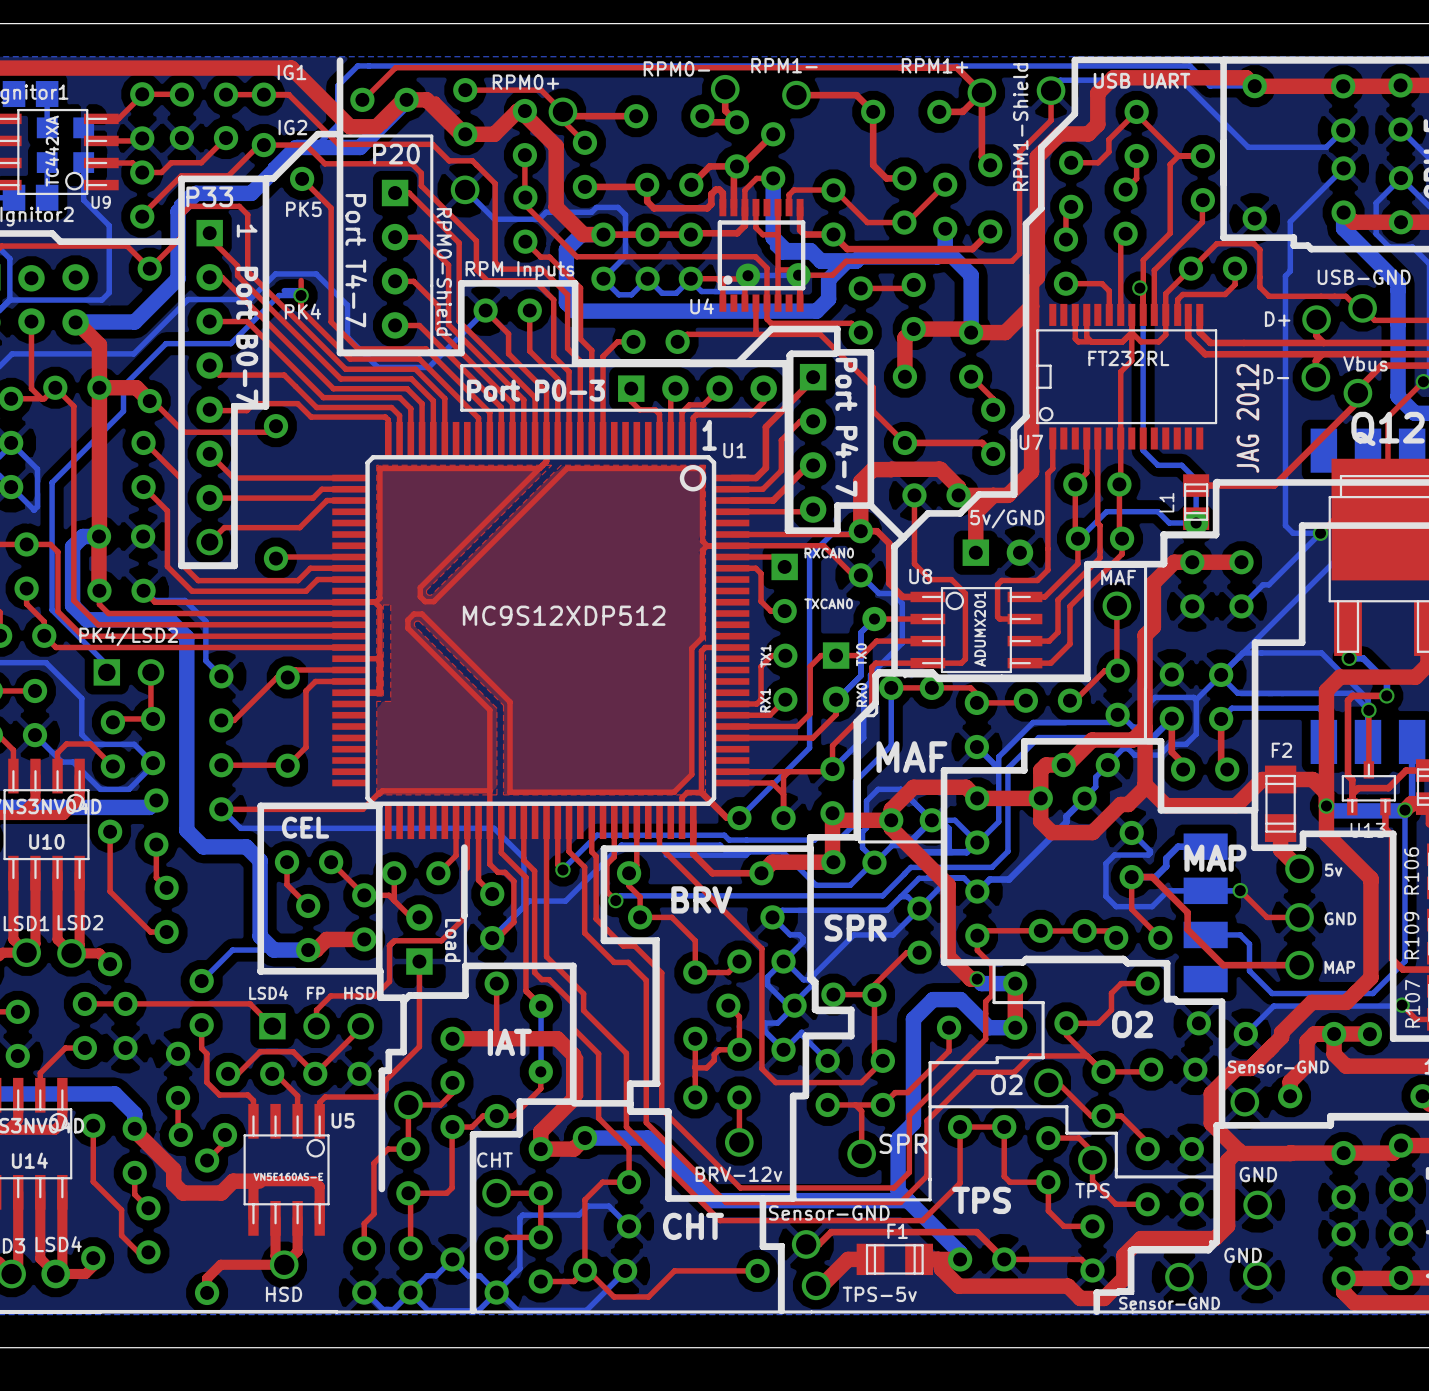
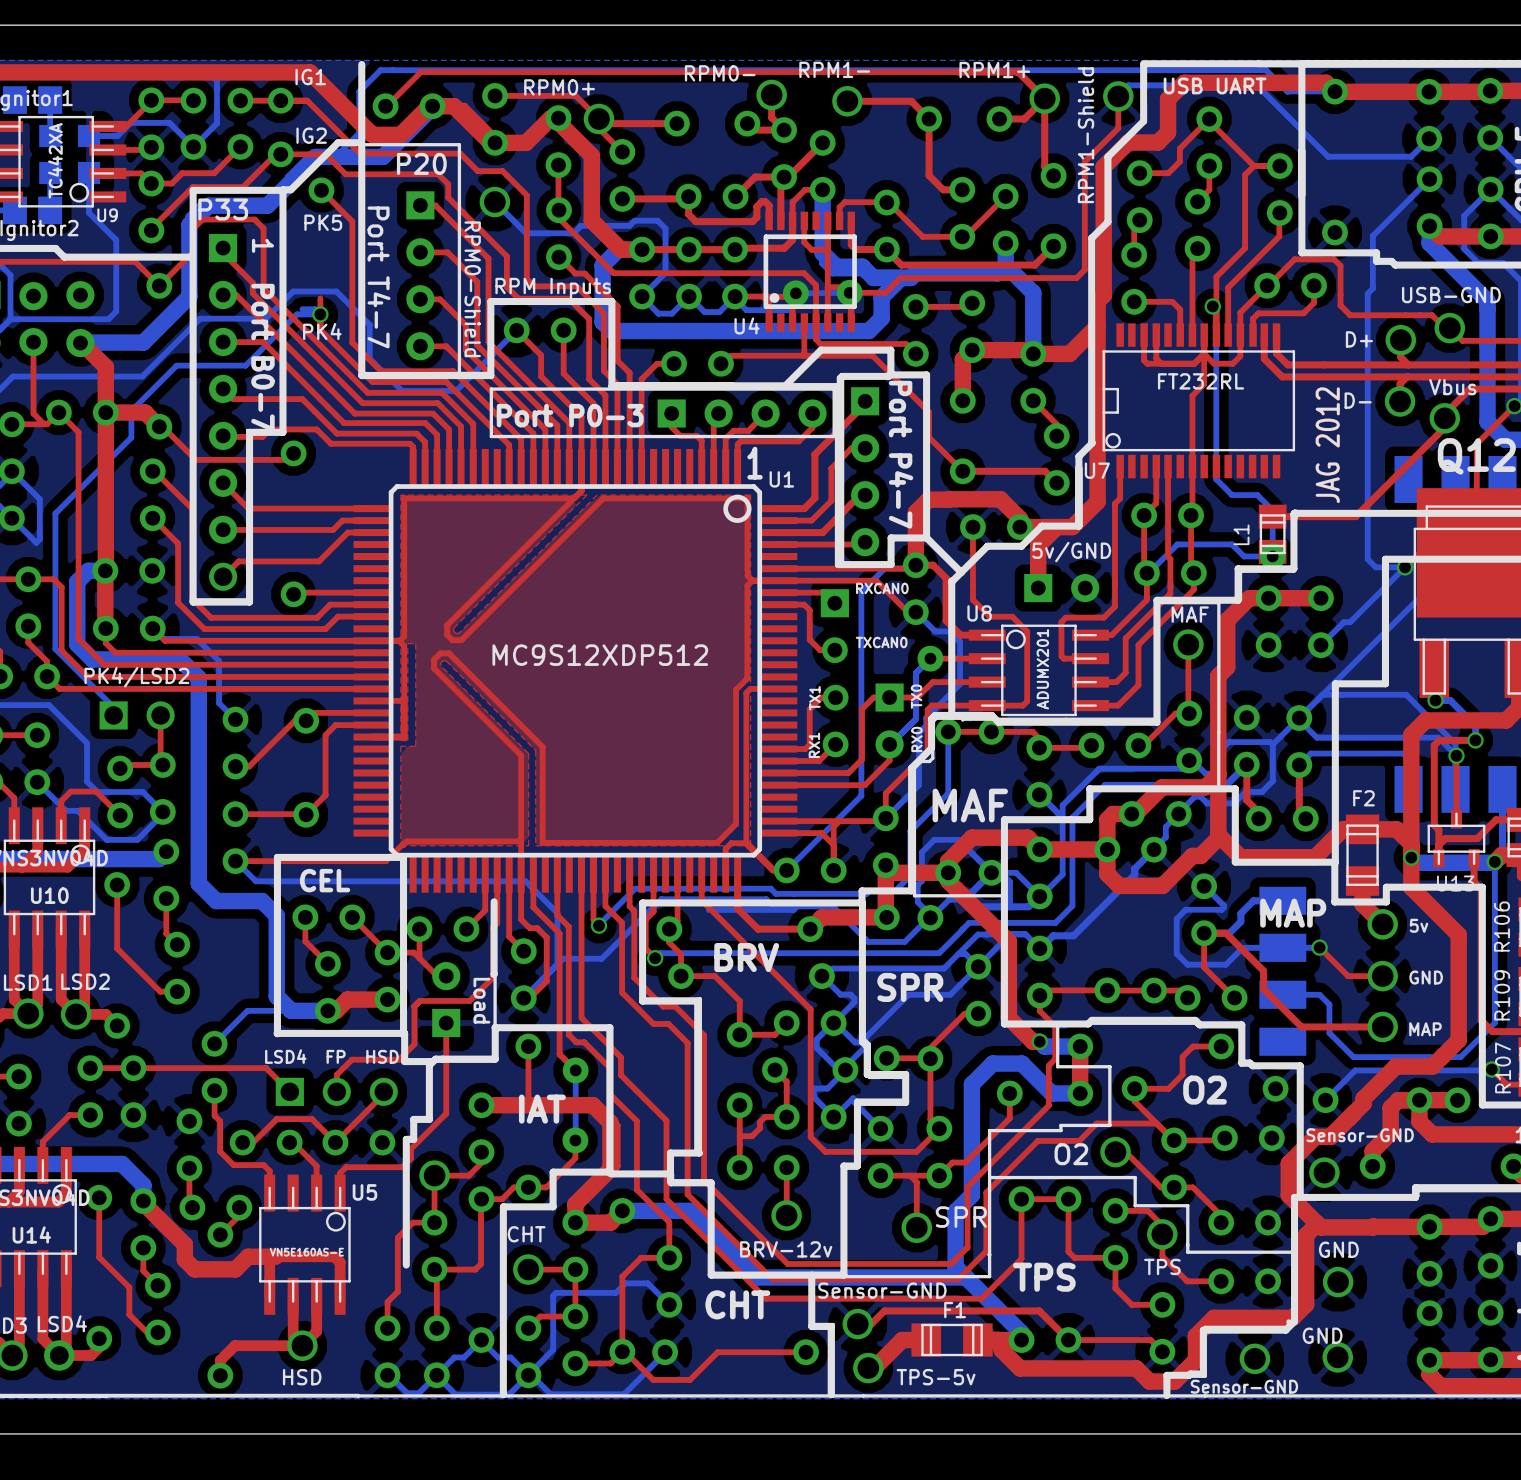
bottom track: none -> (205, 68) (217, 80) (217, 123) (193, 146) (169, 122) (130, 122) (117, 136) (89, 136)

